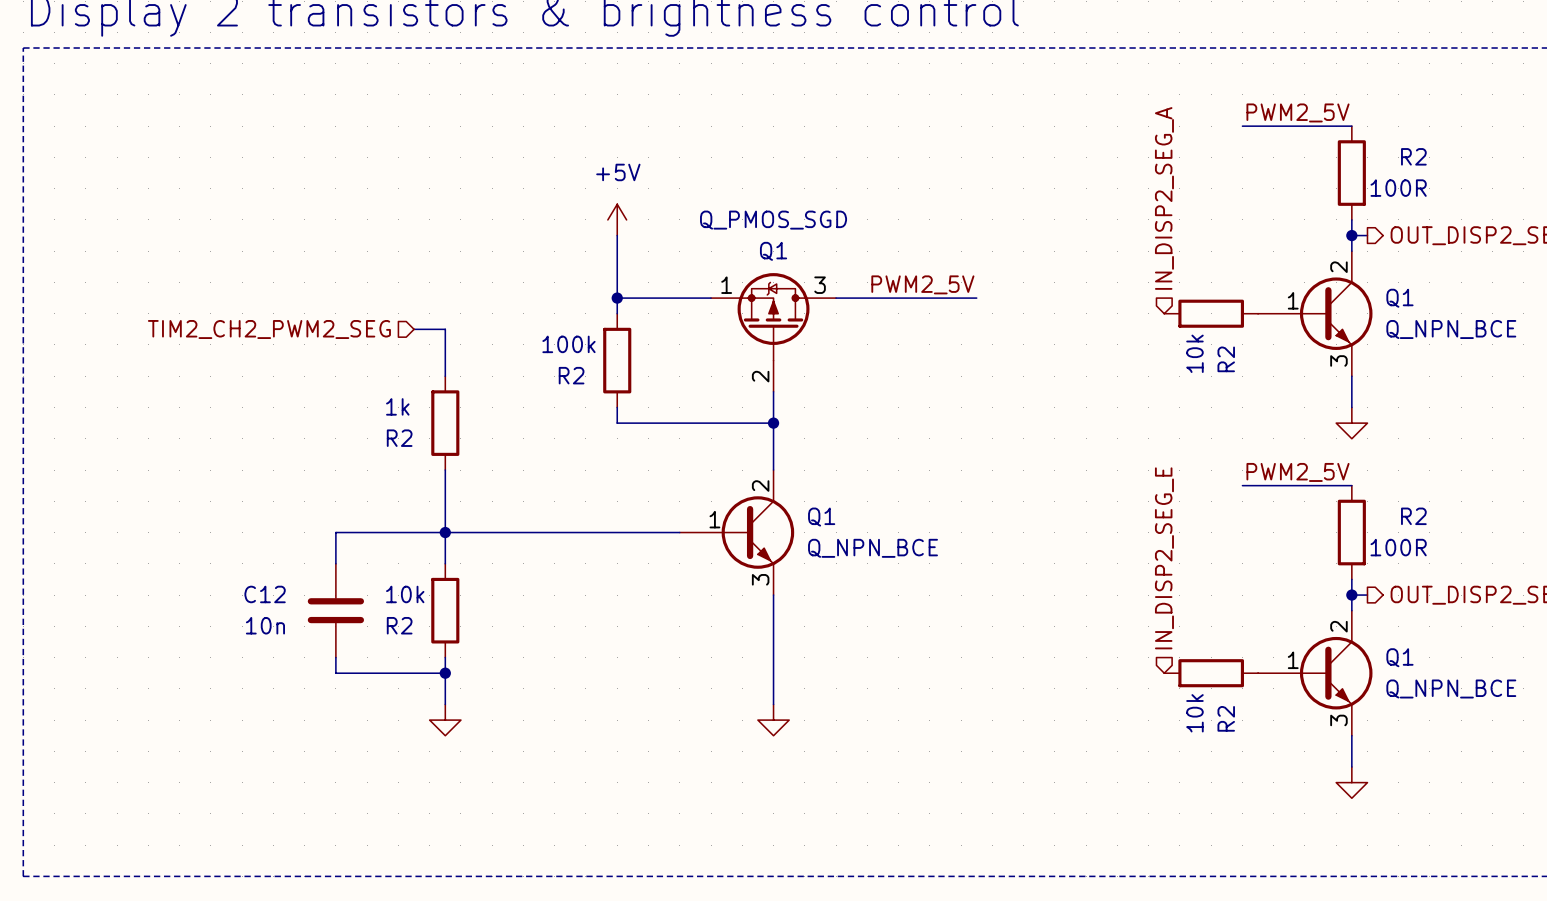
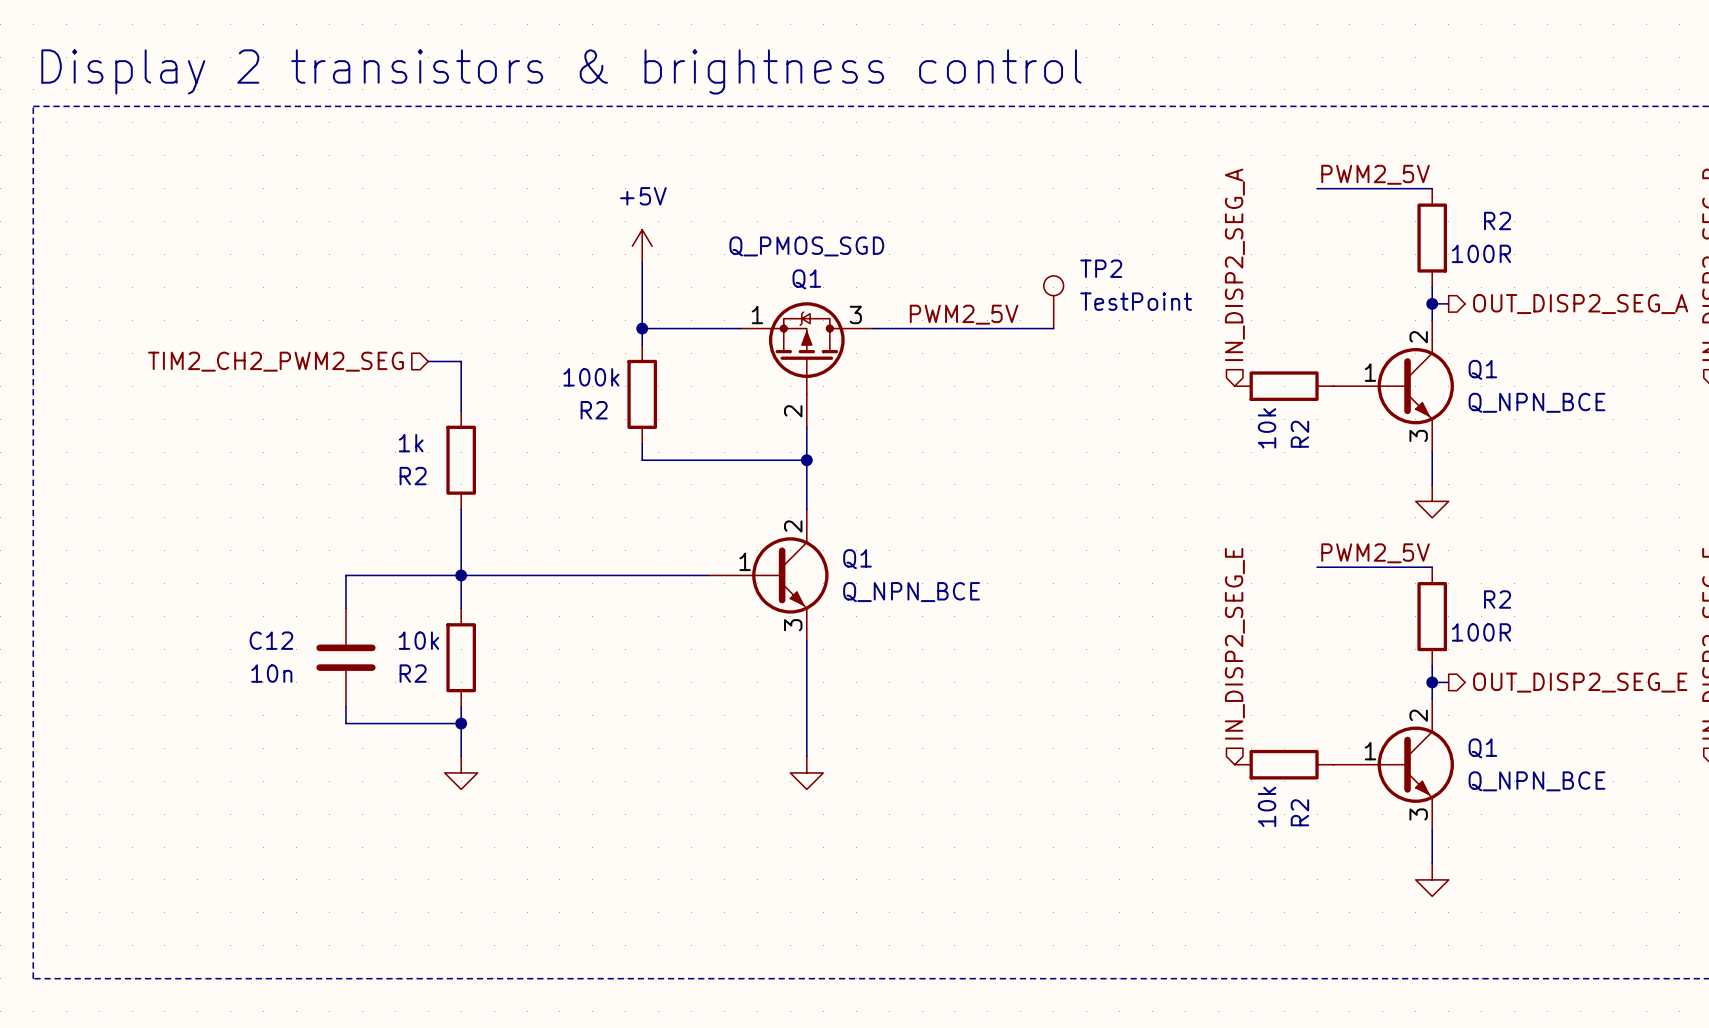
power symbol position: +5V (617, 219) -> +5V (642, 246)
TP2: none -> TestPoint (1053, 302)
wire: (617, 235) (617, 313) -> (642, 262) (642, 345)
wire: none -> (872, 328) (1053, 328)
label position: PWM2_5V (922, 284) -> PWM2_5V (964, 314)
wire: (617, 298) (711, 298) -> (642, 328) (740, 328)
junction position: (617, 298) -> (642, 328)
wire: (836, 298) (976, 298) -> none
hierarchical label position: TIM2_CH2_PWM2_SEG (269, 329) -> TIM2_CH2_PWM2_SEG (275, 361)
wire: (414, 329) (445, 329) (445, 376) -> (428, 361) (461, 361) (461, 410)
Q1 position: (773, 332) -> (806, 364)
R2 position: (617, 360) -> (642, 394)
wire: (773, 391) (773, 470) -> (806, 427) (806, 509)
wire: (617, 407) (617, 423) (773, 423) -> (642, 443) (642, 460) (806, 460)
R2 position: (445, 423) -> (461, 460)
junction position: (773, 423) -> (806, 460)
wire: (445, 470) (445, 563) -> (461, 509) (461, 608)
junction position: (445, 532) -> (461, 575)
wire: (679, 532) (335, 532) (335, 563) -> (708, 575) (345, 575) (345, 608)
Q1 position: (736, 532) -> (768, 575)
wire: (773, 595) (773, 704) -> (806, 641) (806, 756)
C12 position: (335, 610) -> (345, 657)
R2 position: (445, 610) -> (461, 657)
wire: (335, 657) (335, 673) (445, 673) -> (345, 707) (345, 723) (461, 723)
wire: (445, 657) (445, 704) -> (461, 707) (461, 756)
junction position: (445, 673) -> (461, 723)
power symbol position: (445, 720) -> (461, 772)
power symbol position: (773, 720) -> (806, 772)

